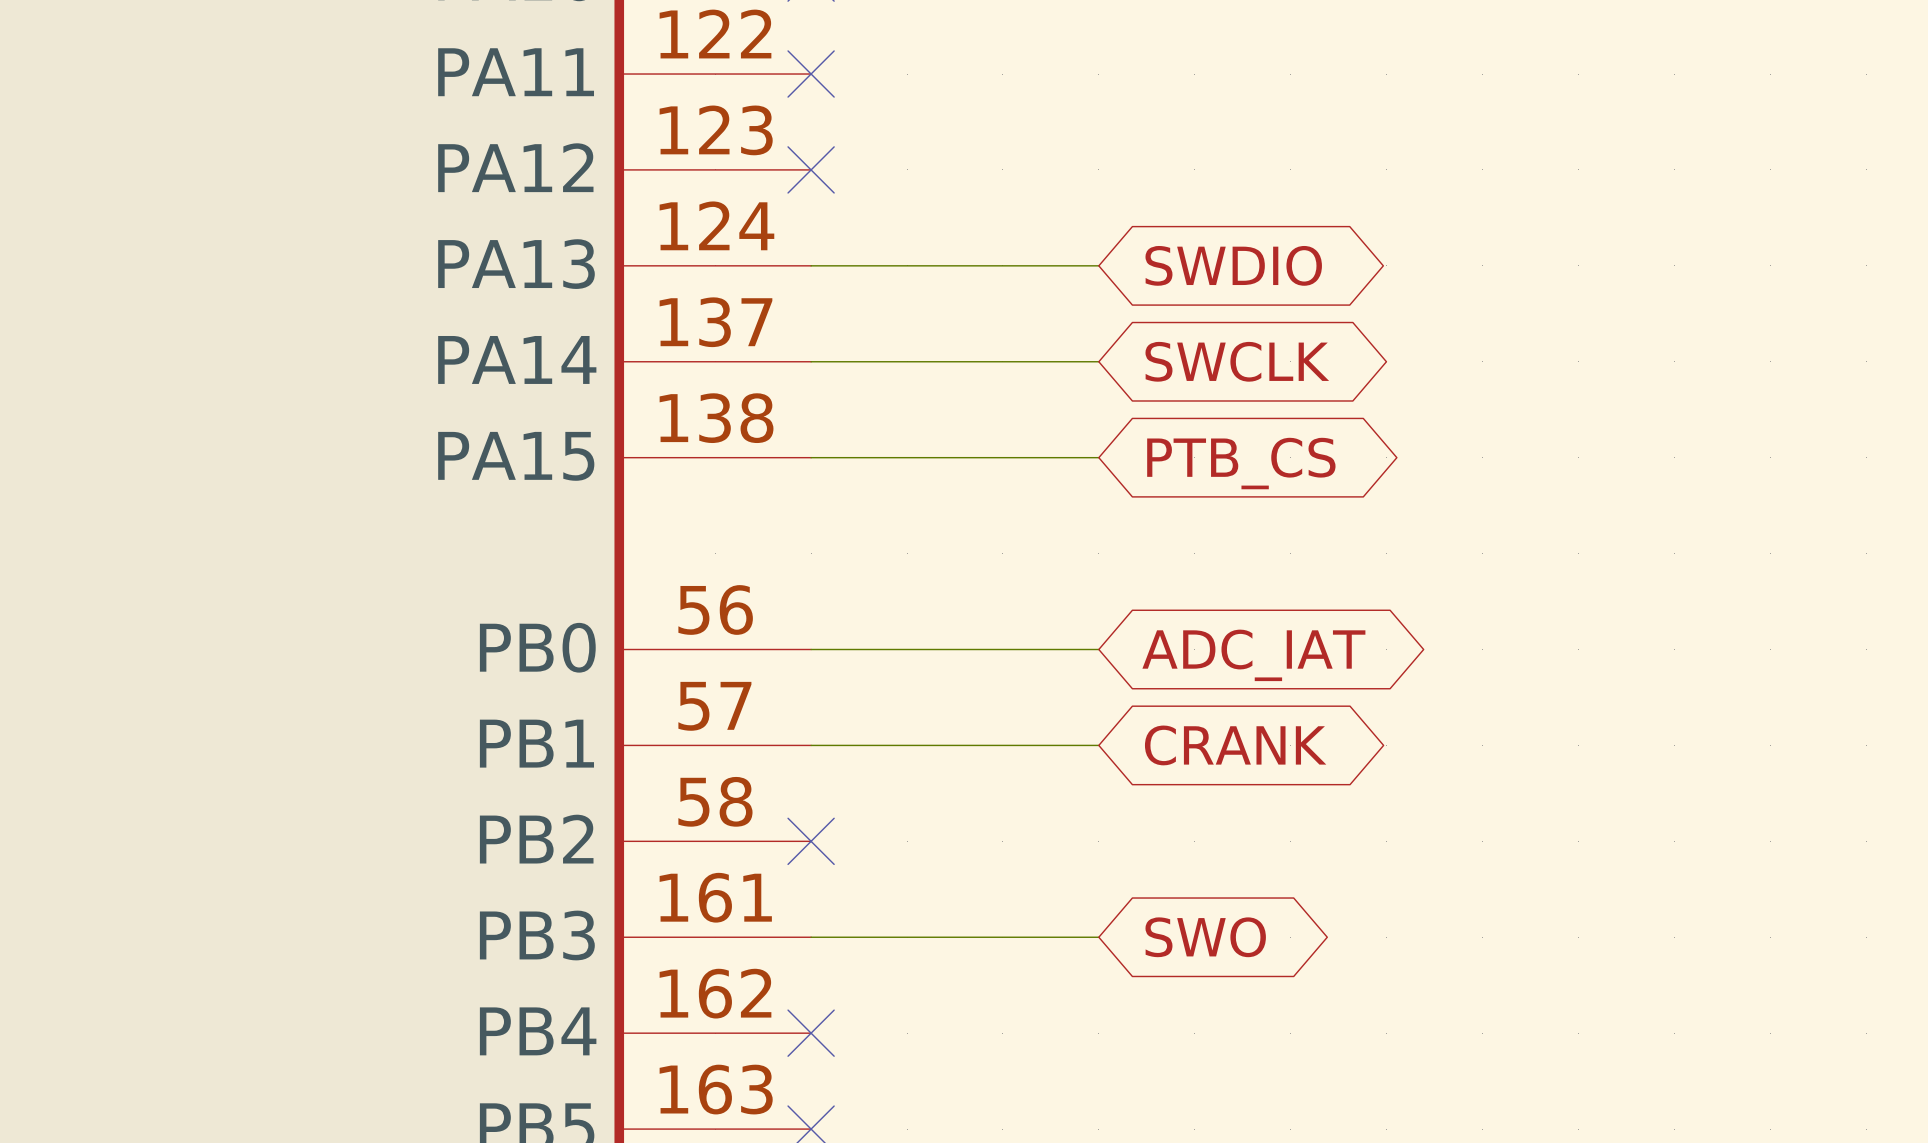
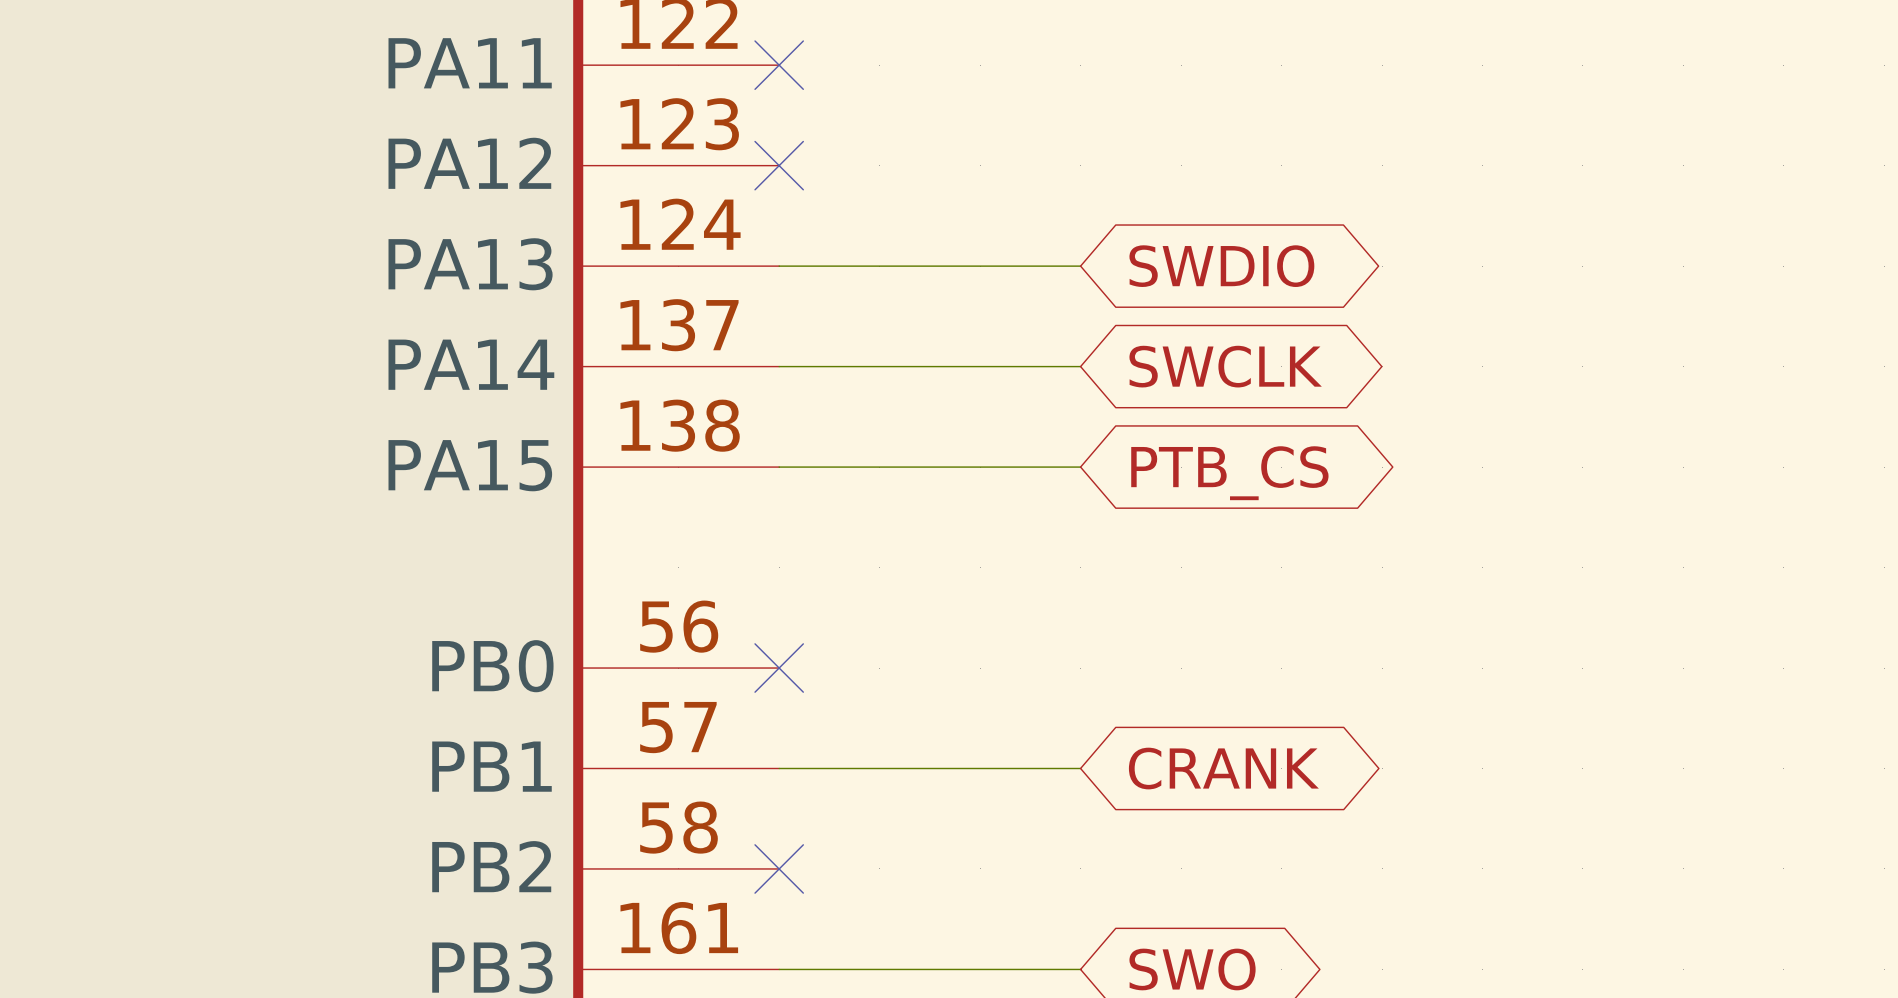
wire: (811, 649) (1098, 649) -> none
no-connect mark: none -> (779, 668)
global label: ADC_IAT (1253, 655) -> none

